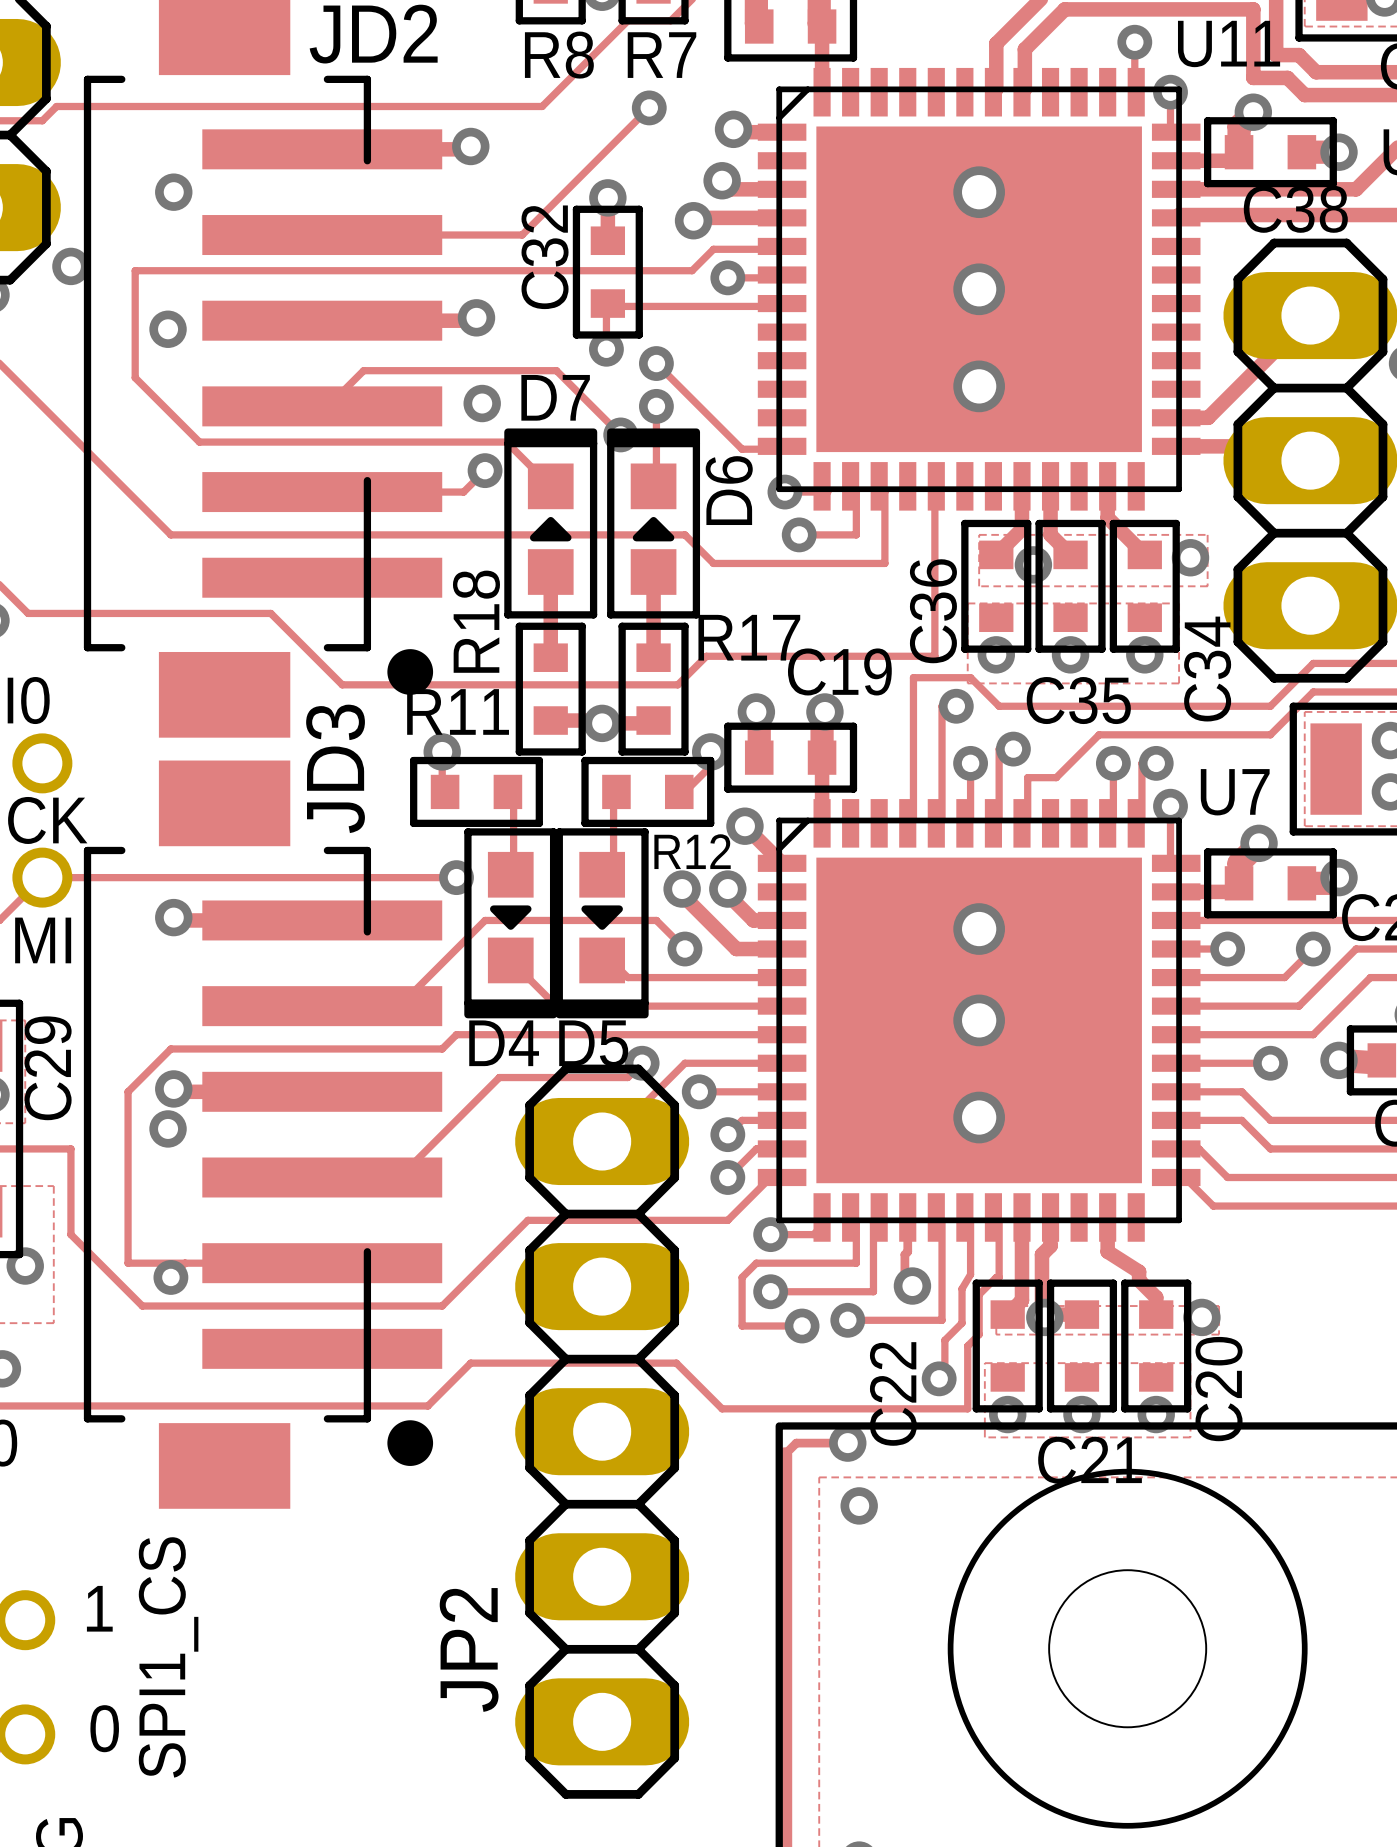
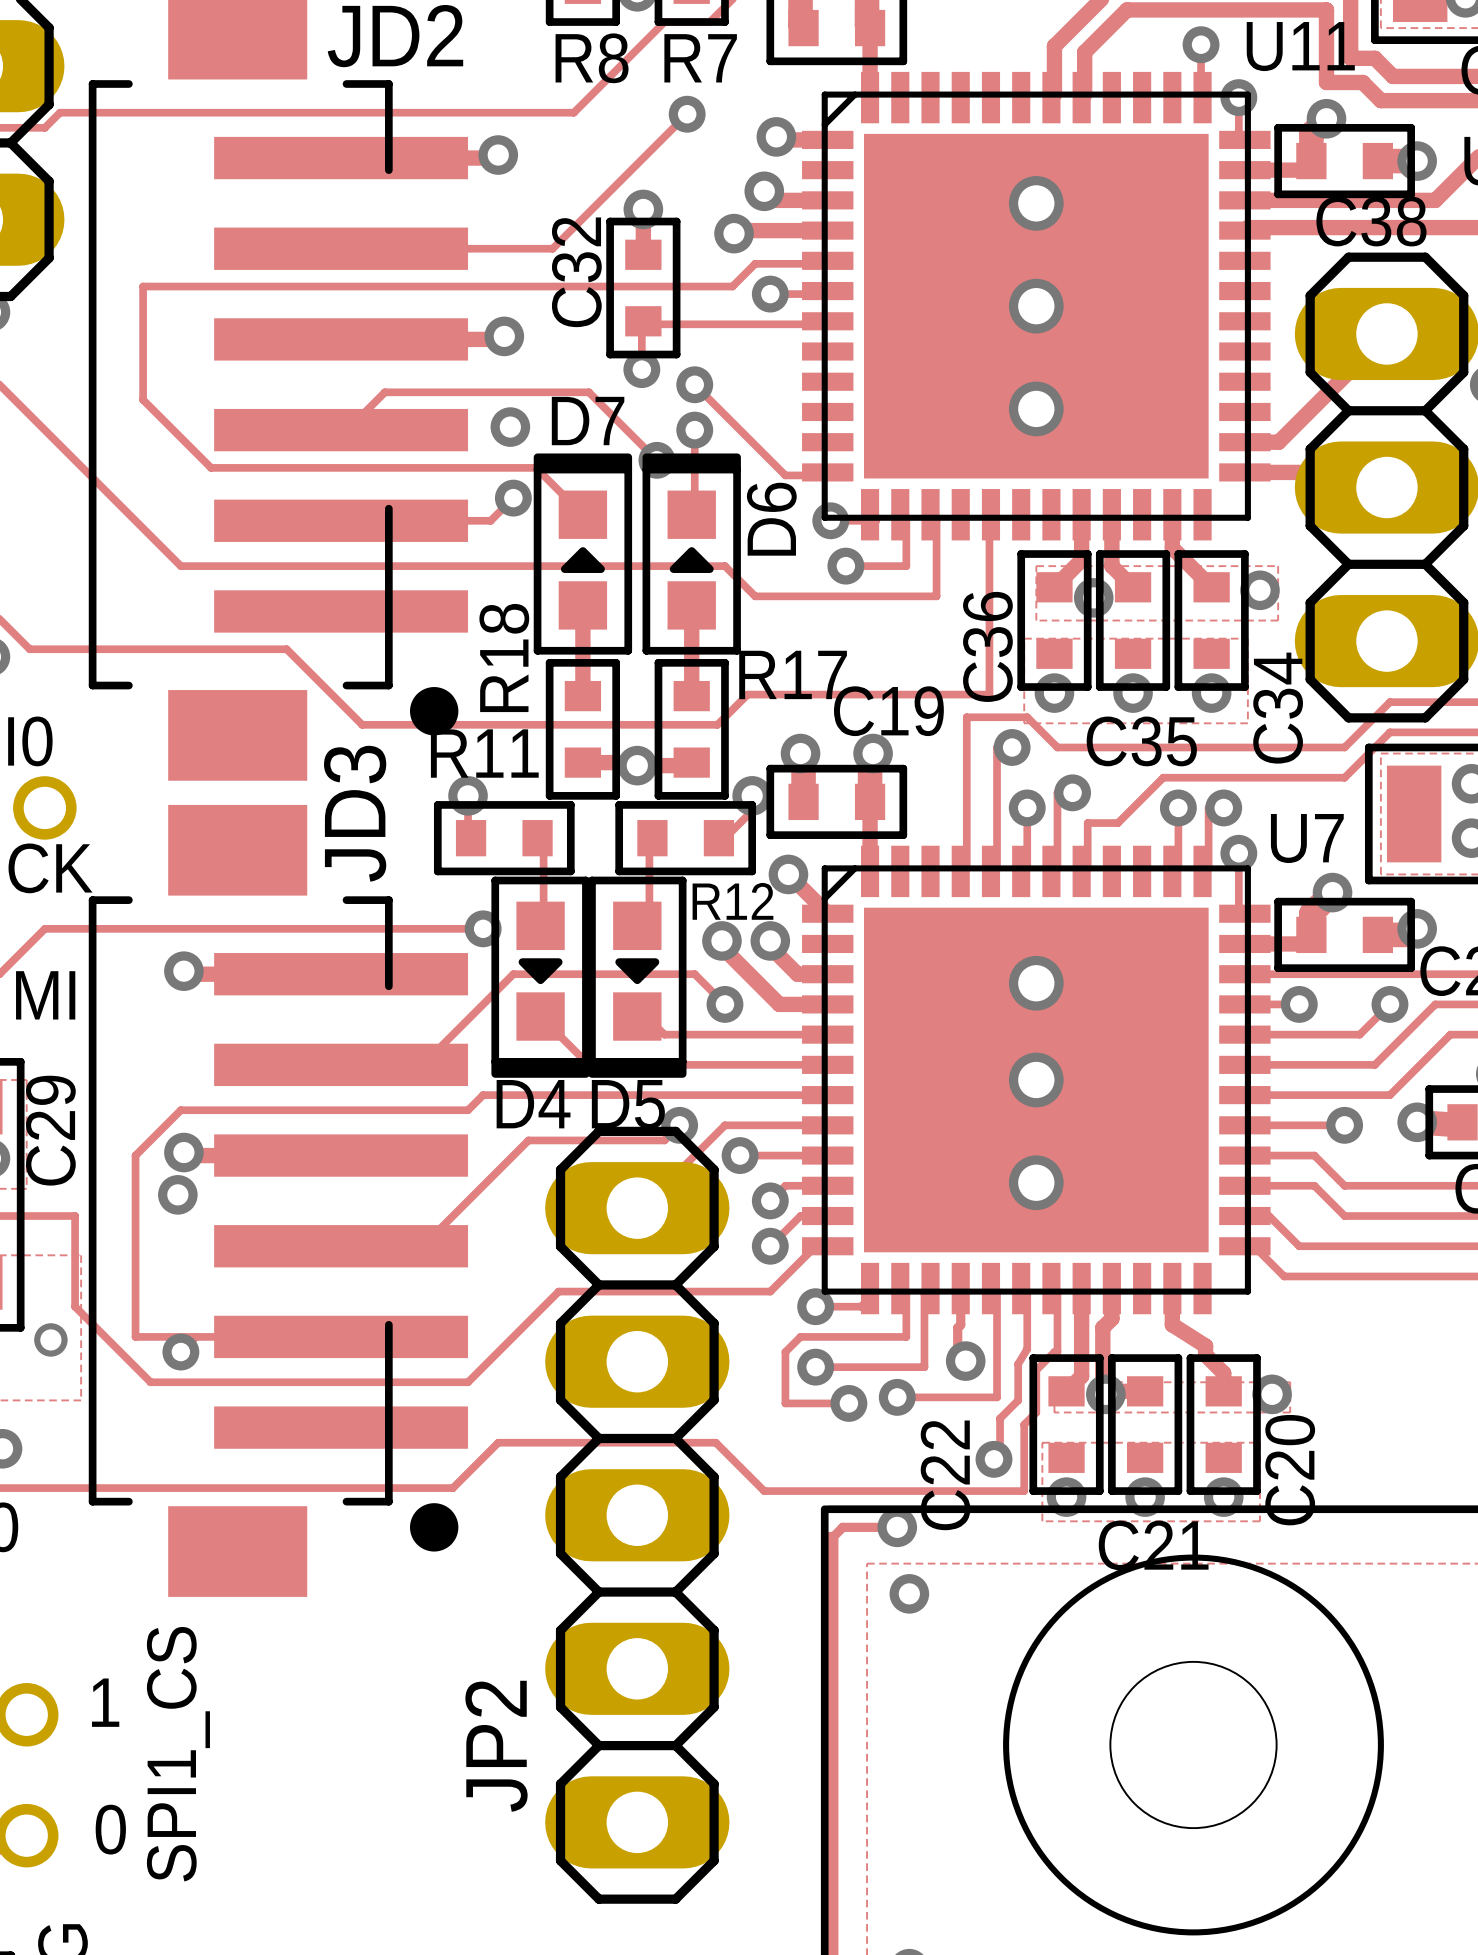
via: (173, 192) -> none
via: (70, 266) -> none
via: (168, 329) -> none
part: (42, 877) -> none
zone outline: (53, 1186) (53, 1323) -> (56, 1255) (81, 1255) (81, 1400) (56, 1400)
via position: (25, 1266) -> (50, 1339)

